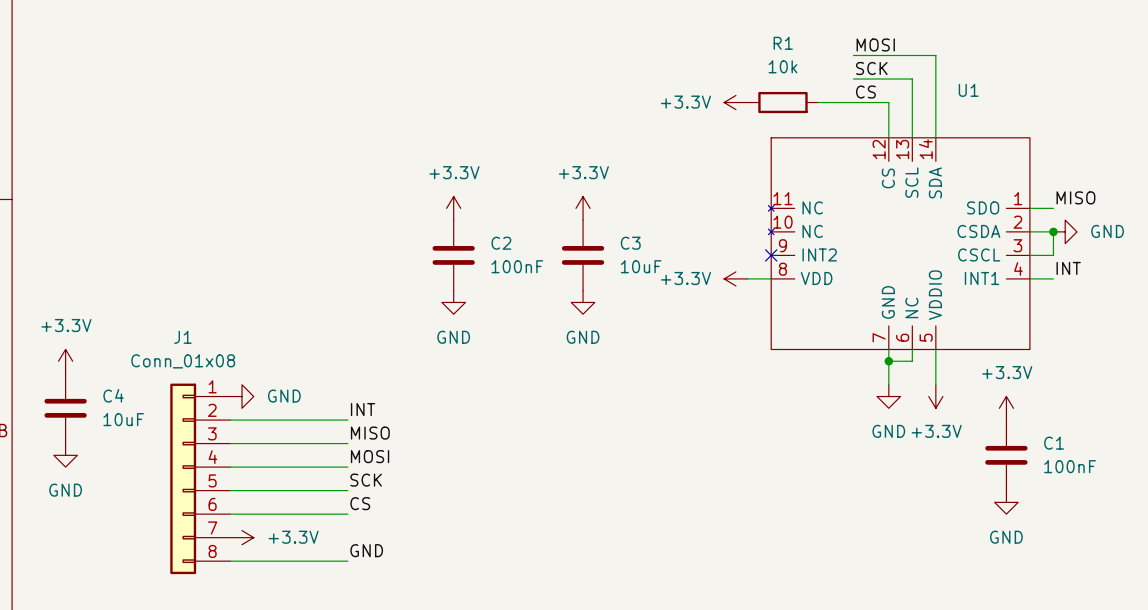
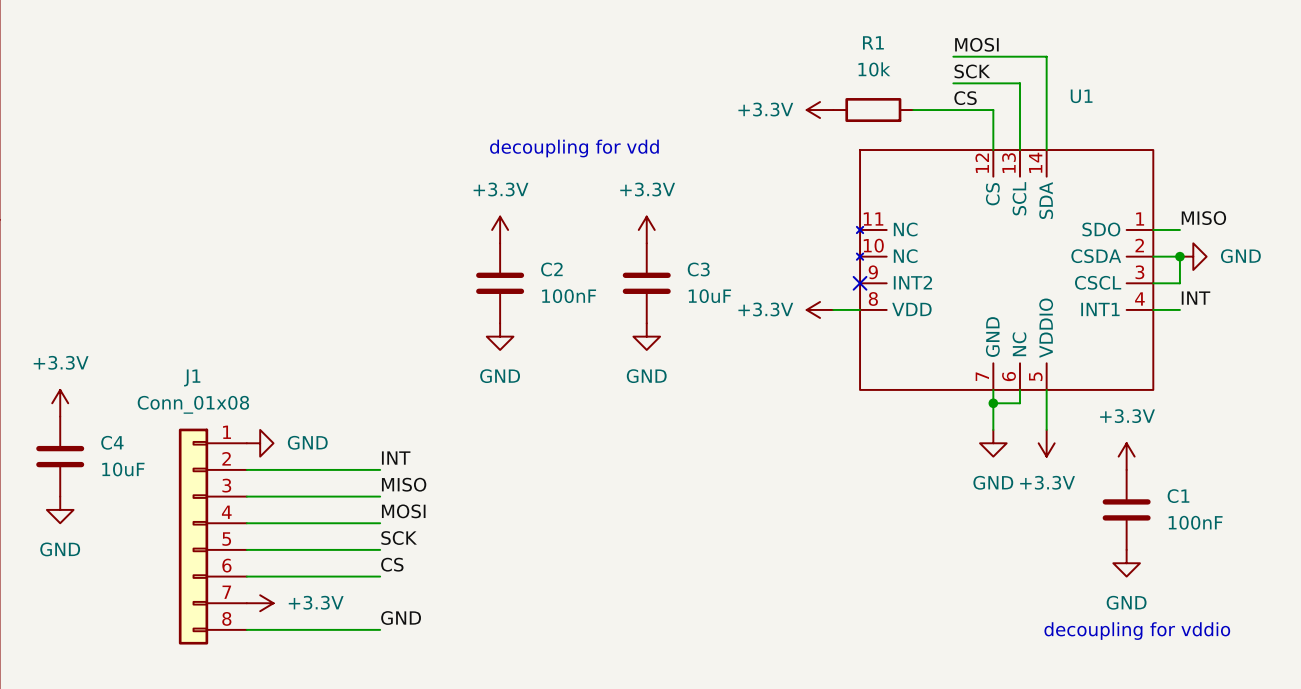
text: none -> decoupling for vdd (574, 148)
text: none -> decoupling for vddio (1137, 631)

